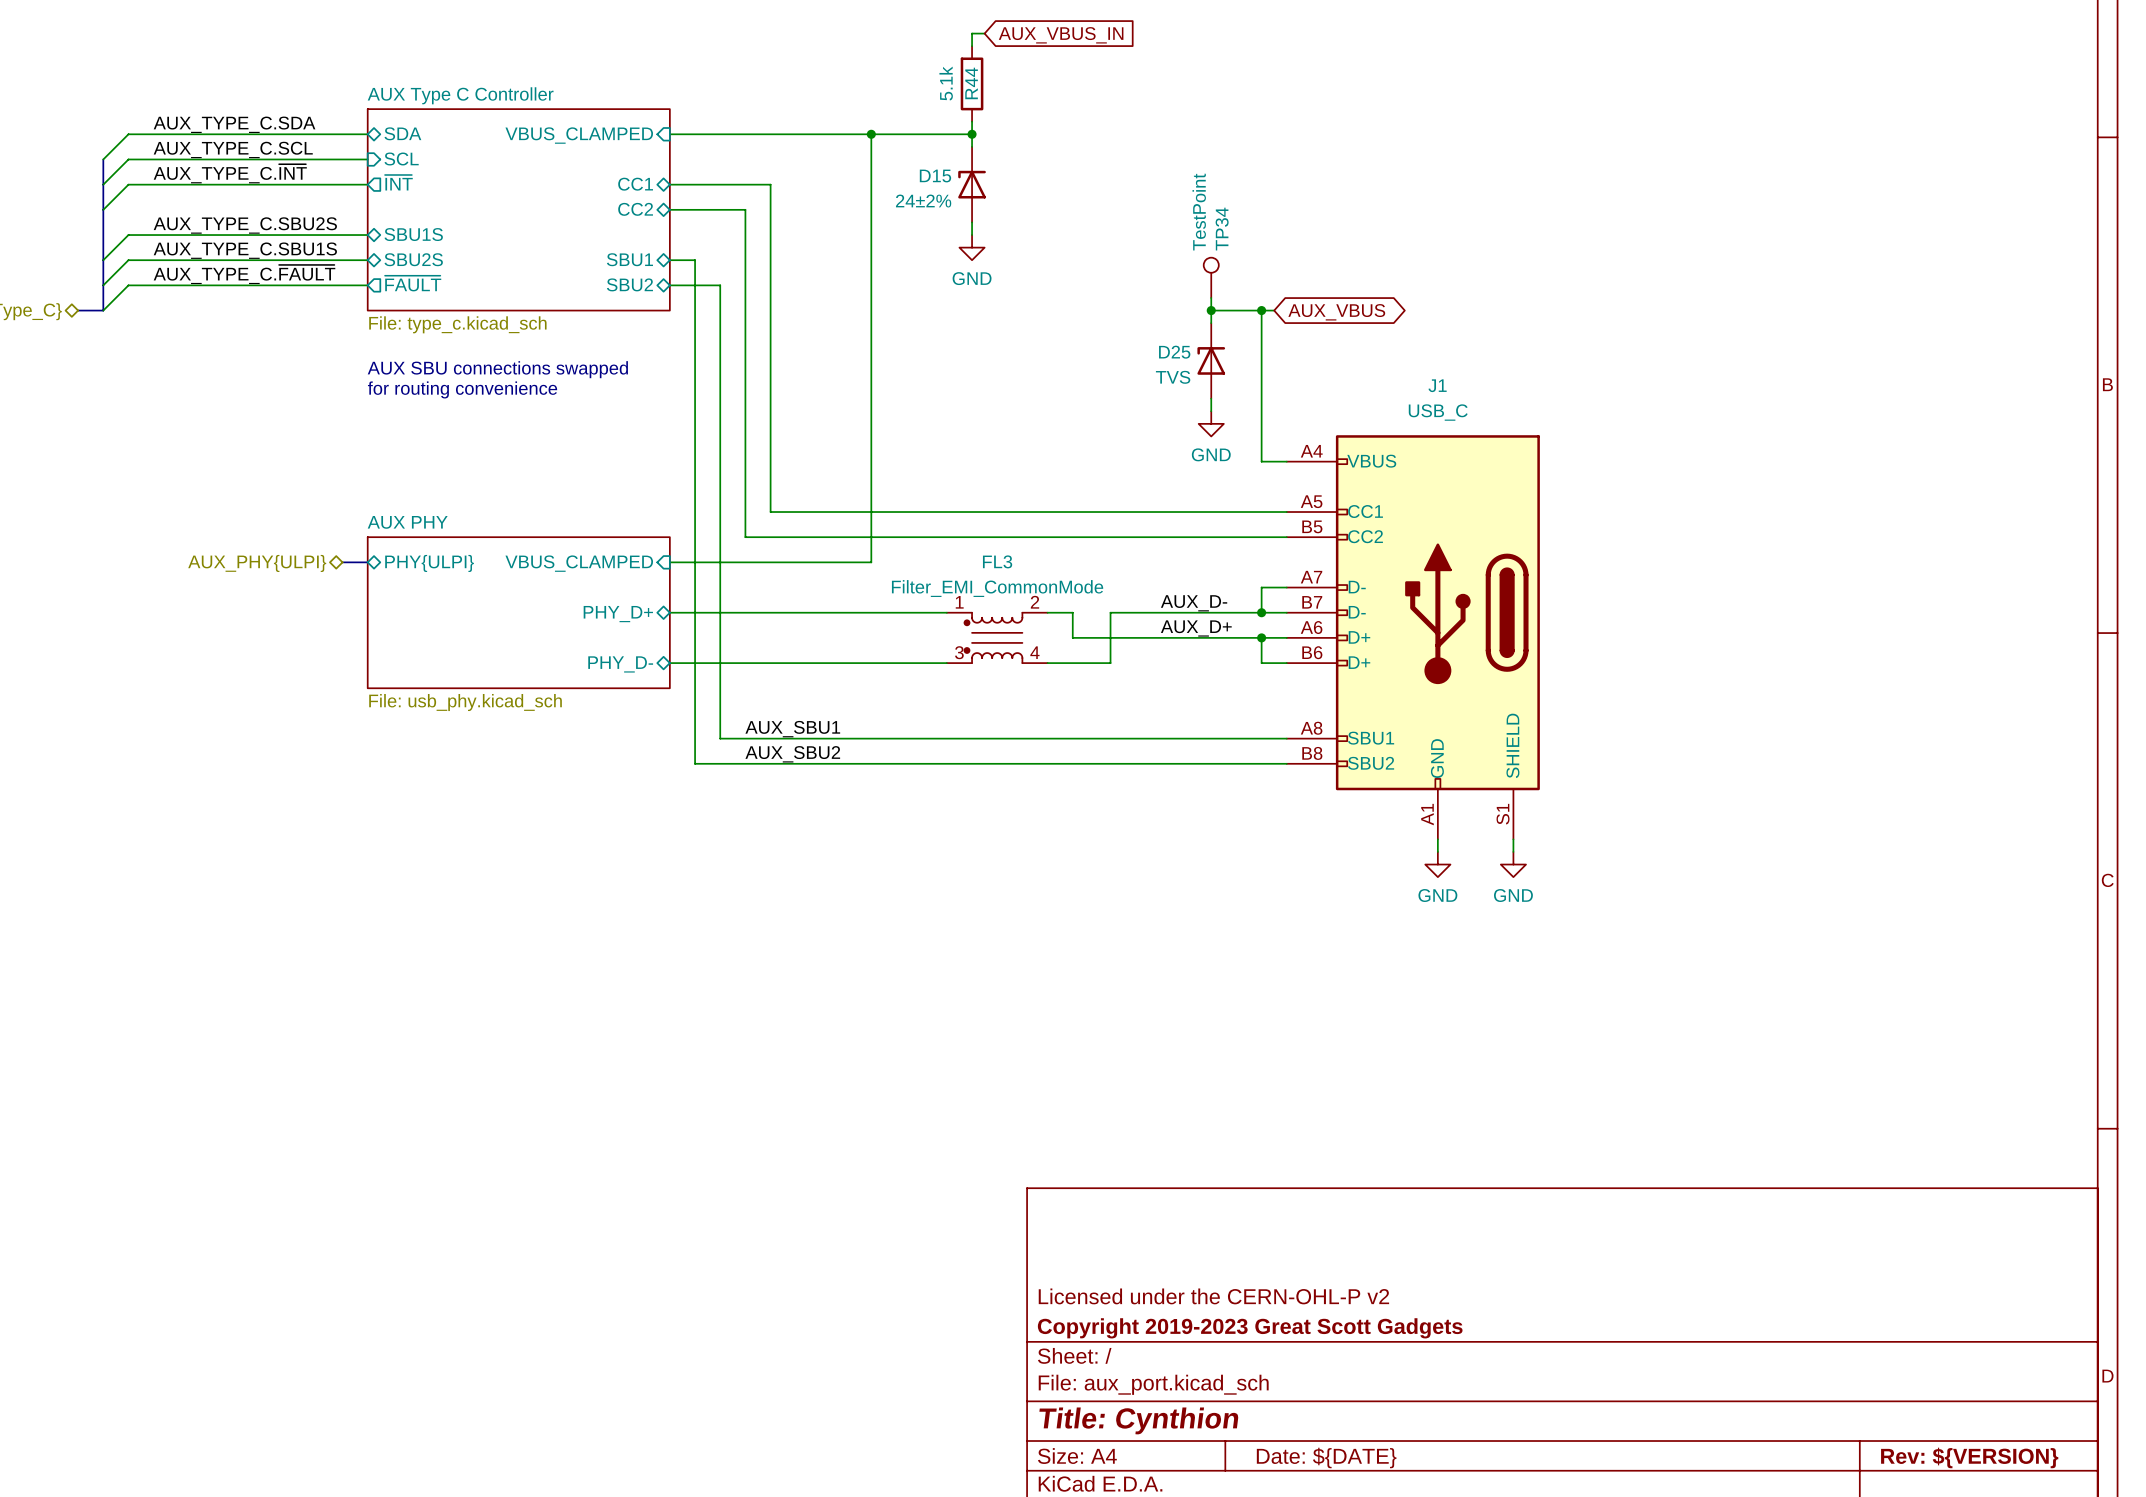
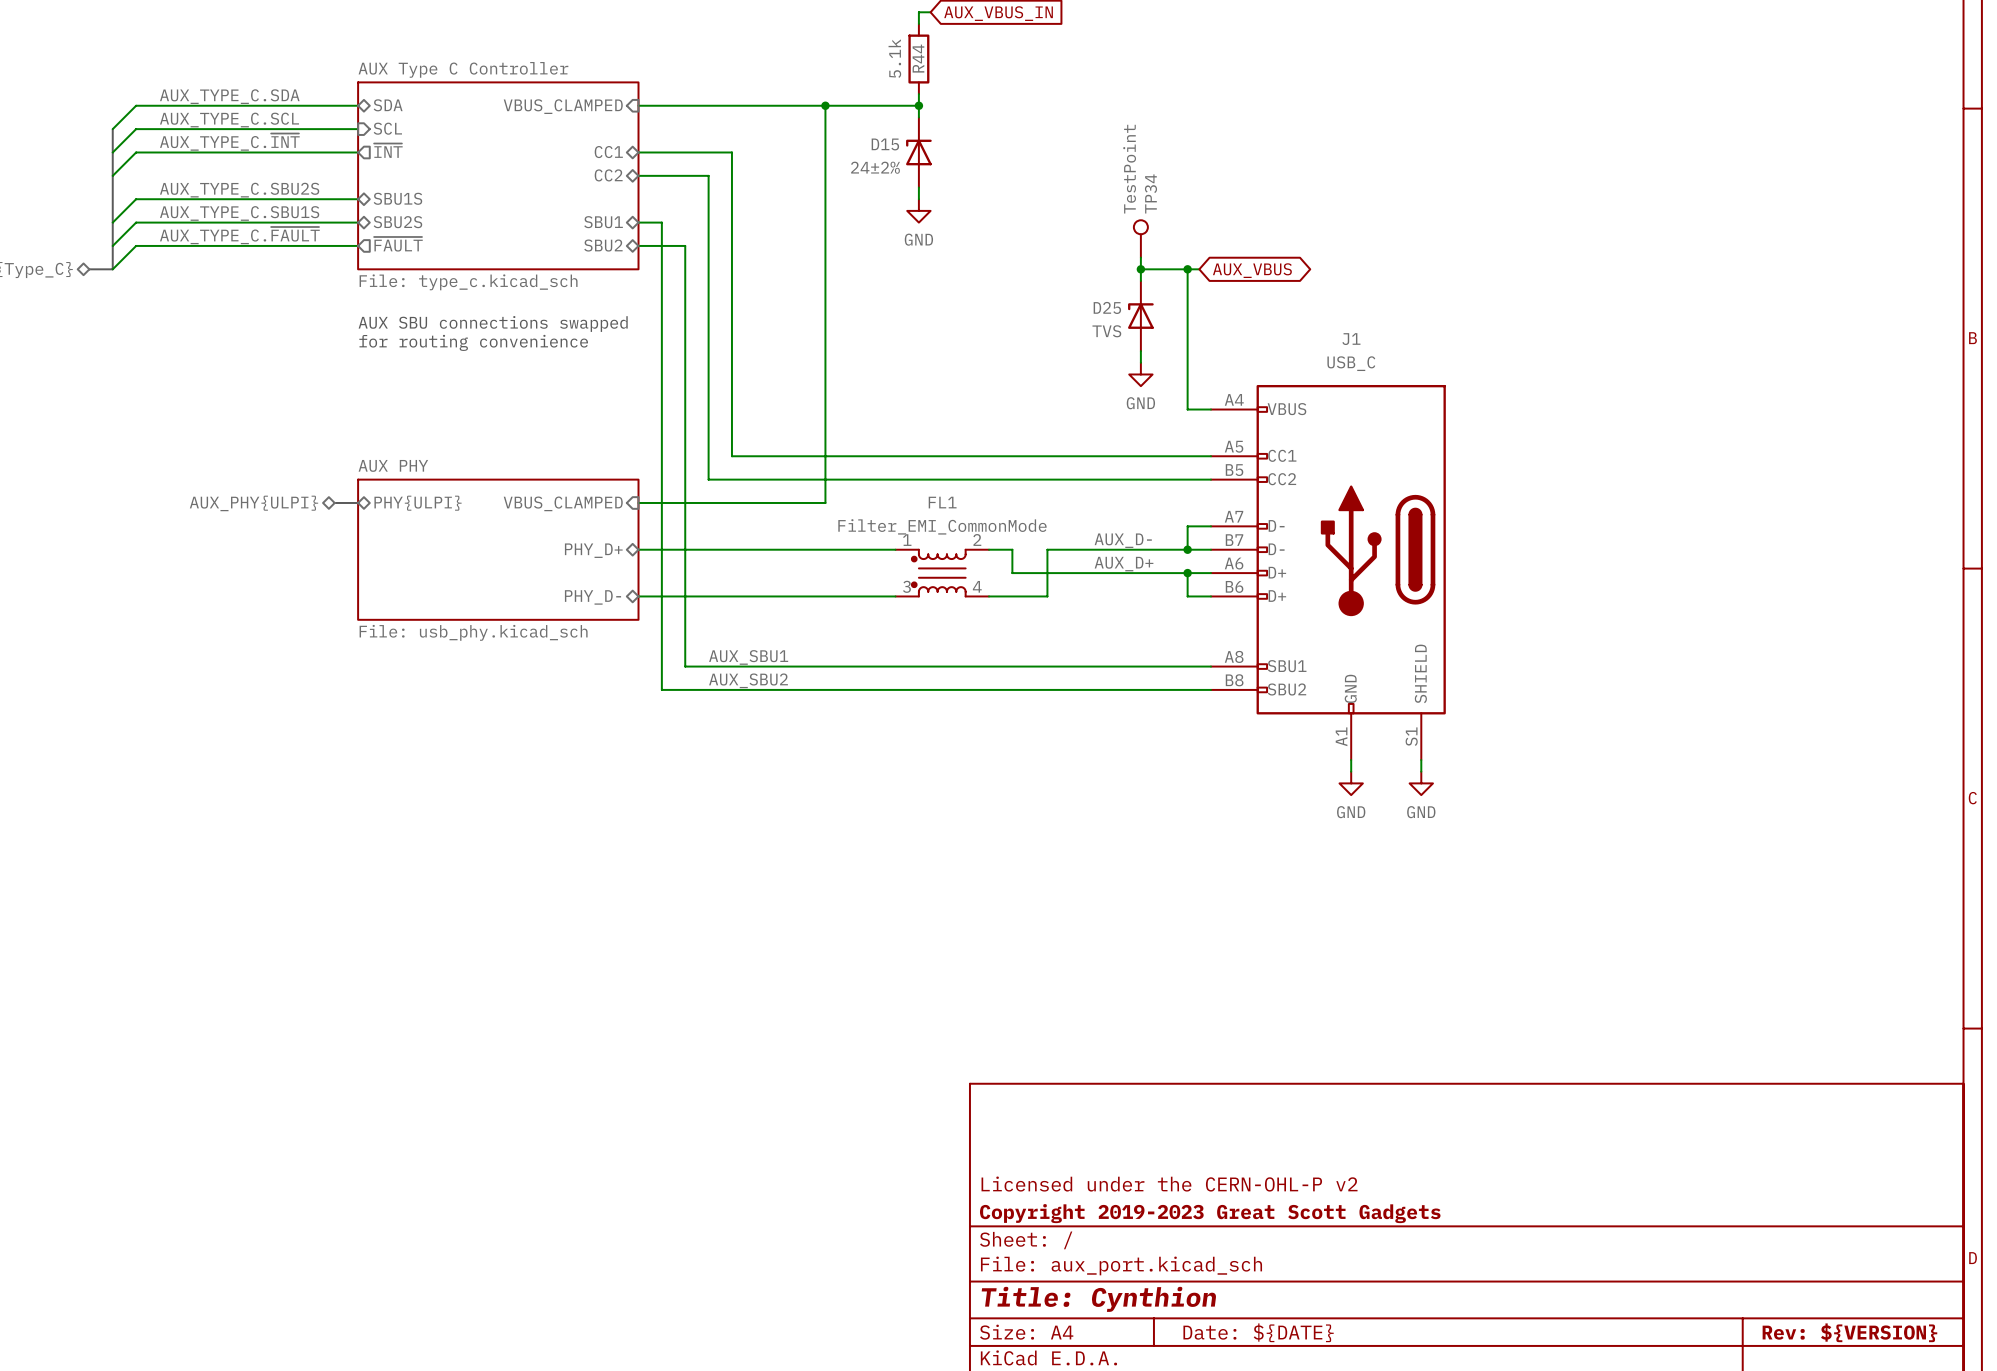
FL3 name: FL3 (997, 561) -> FL1 (942, 502)

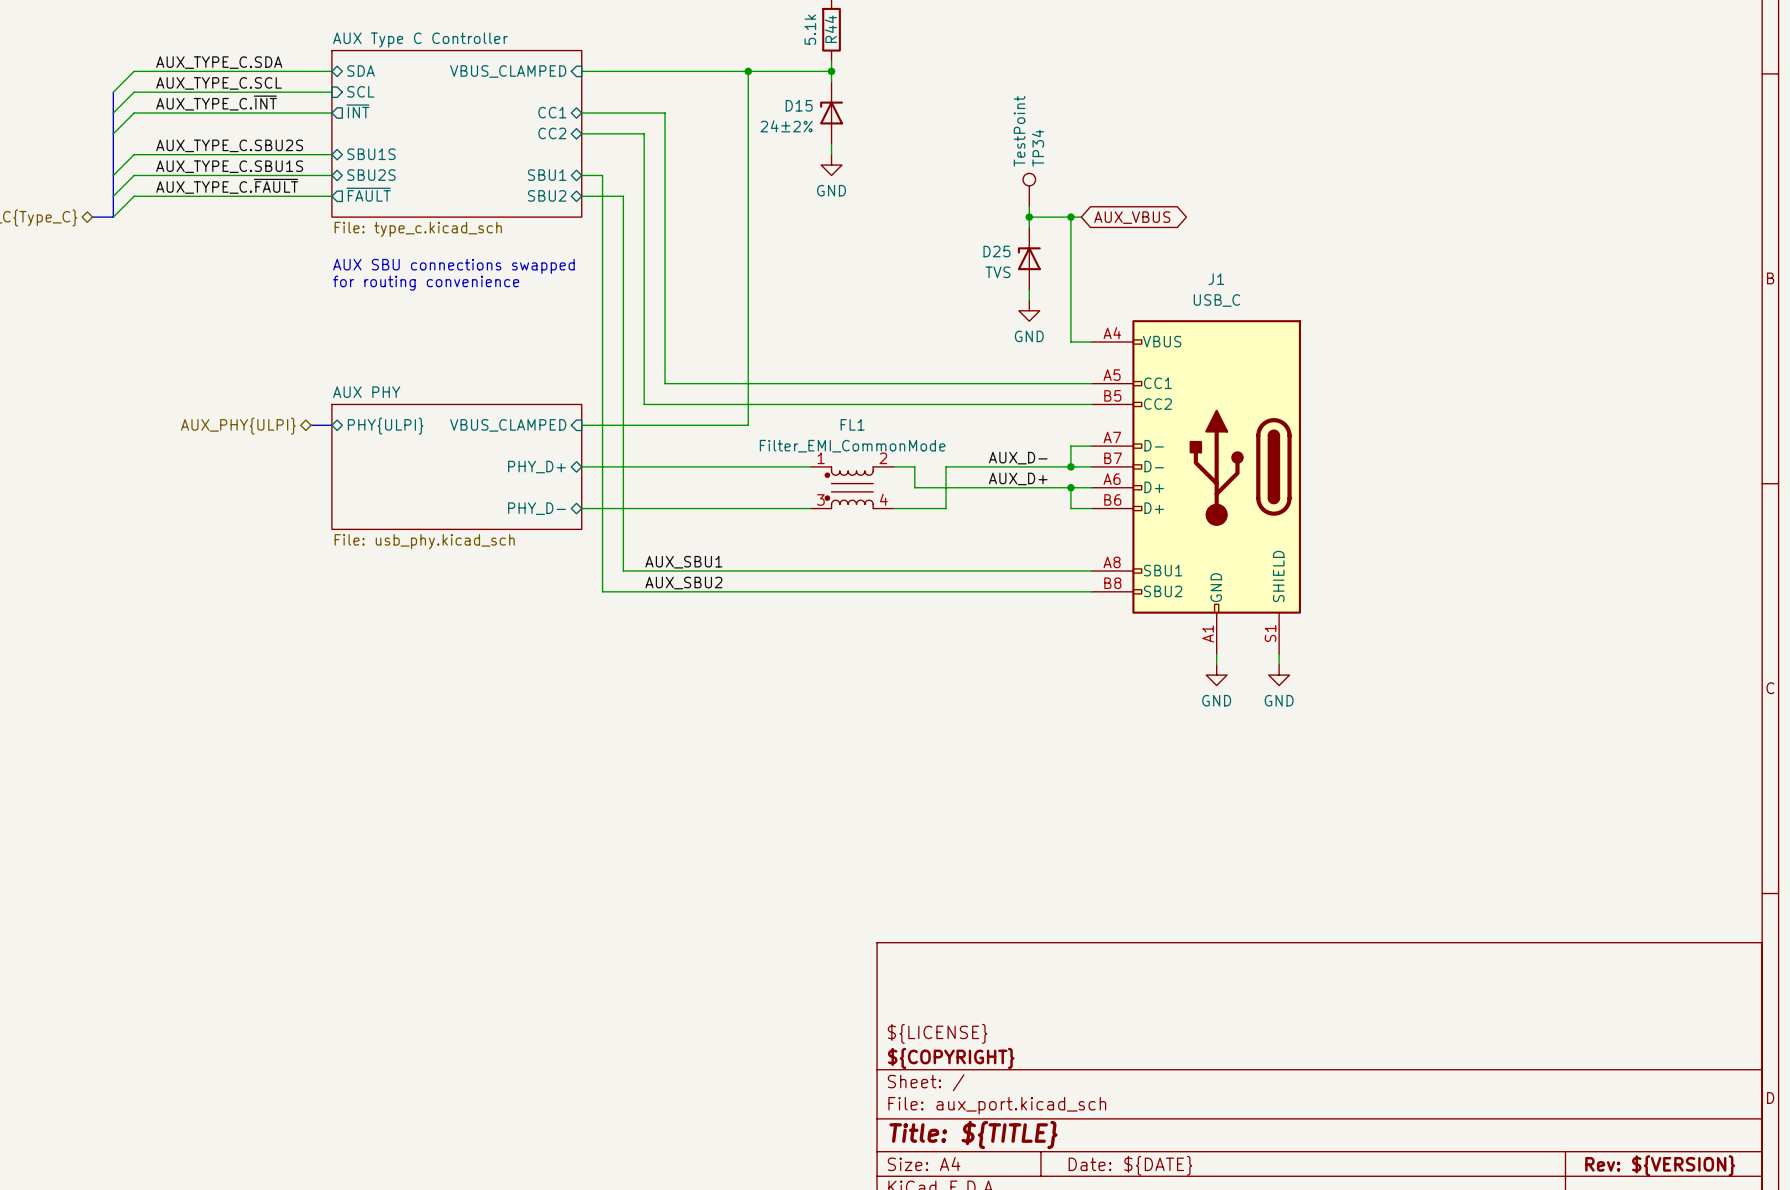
title block: Licensed under the CERN-OHL-P v2 (1169, 1184) -> ${LICENSE} (937, 1033)
title block: Copyright 2019-2023 Great Scott Gadgets (1210, 1213) -> ${COPYRIGHT} (951, 1058)
title block: Title: Cynthion (1098, 1299) -> Title: ${TITLE} (973, 1134)

